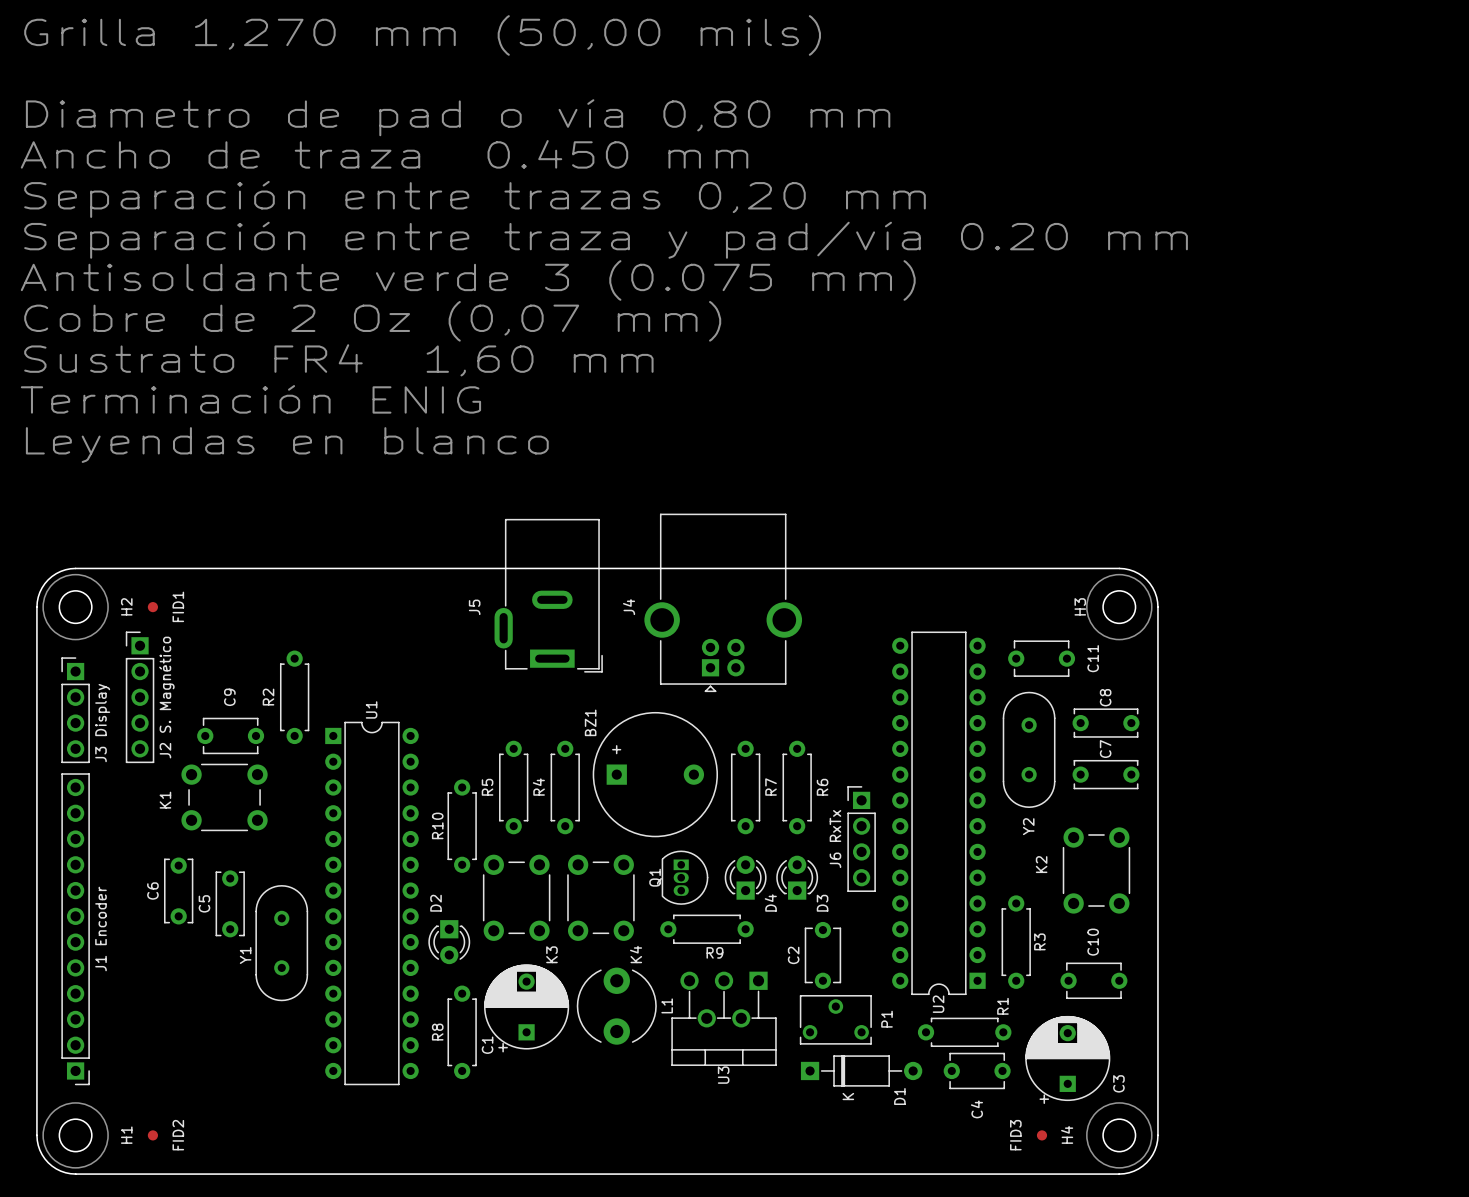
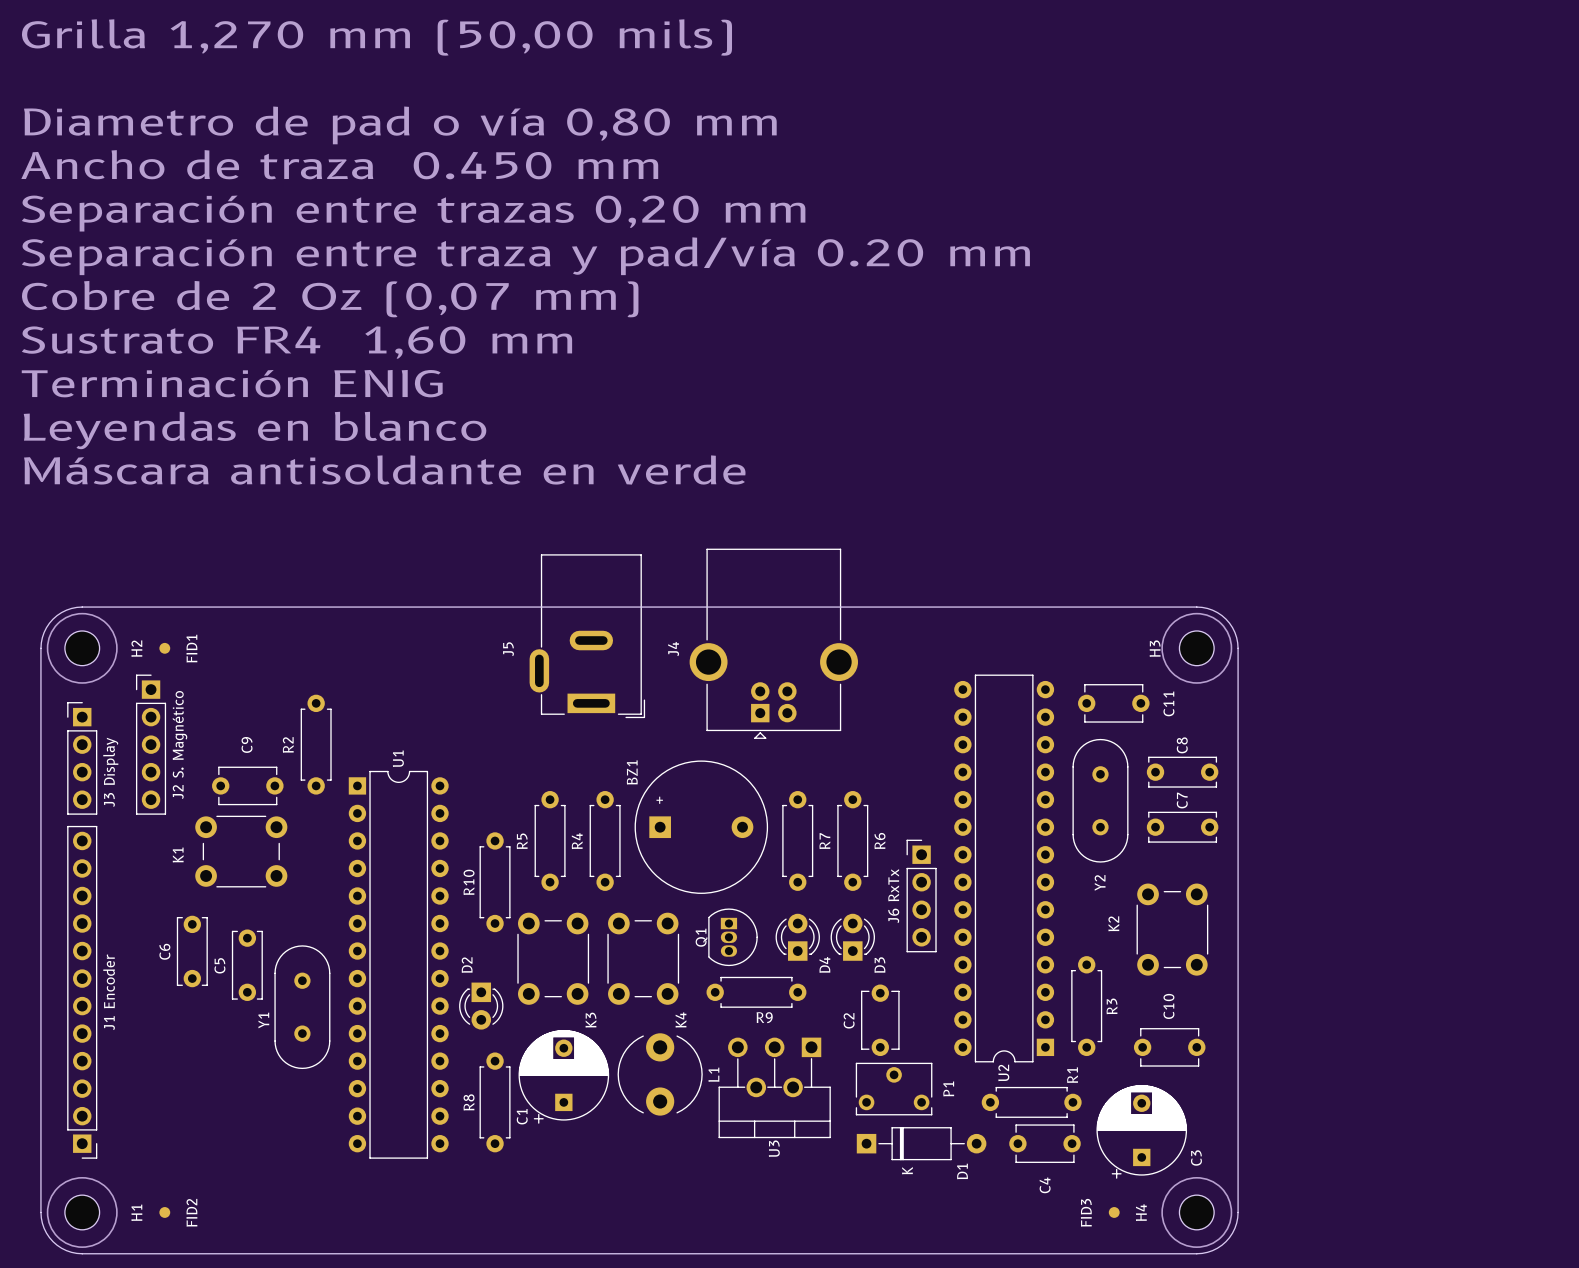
text: Antisoldante verde 3 (0.075 mm) (468, 280) -> Cobre de 2 Oz (0,07 mm) (330, 299)
text: Cobre de 2 Oz (0,07 mm) (372, 321) -> Sustrato FR4 1,60 mm (296, 342)
text: Sustrato FR4 1,60 mm (338, 360) -> Terminación ENIG (232, 383)
text: Terminación ENIG (250, 399) -> Leyendas en blanco (255, 430)
text: Leyendas en blanco (287, 445) -> Máscara antisoldante en verde (384, 470)

